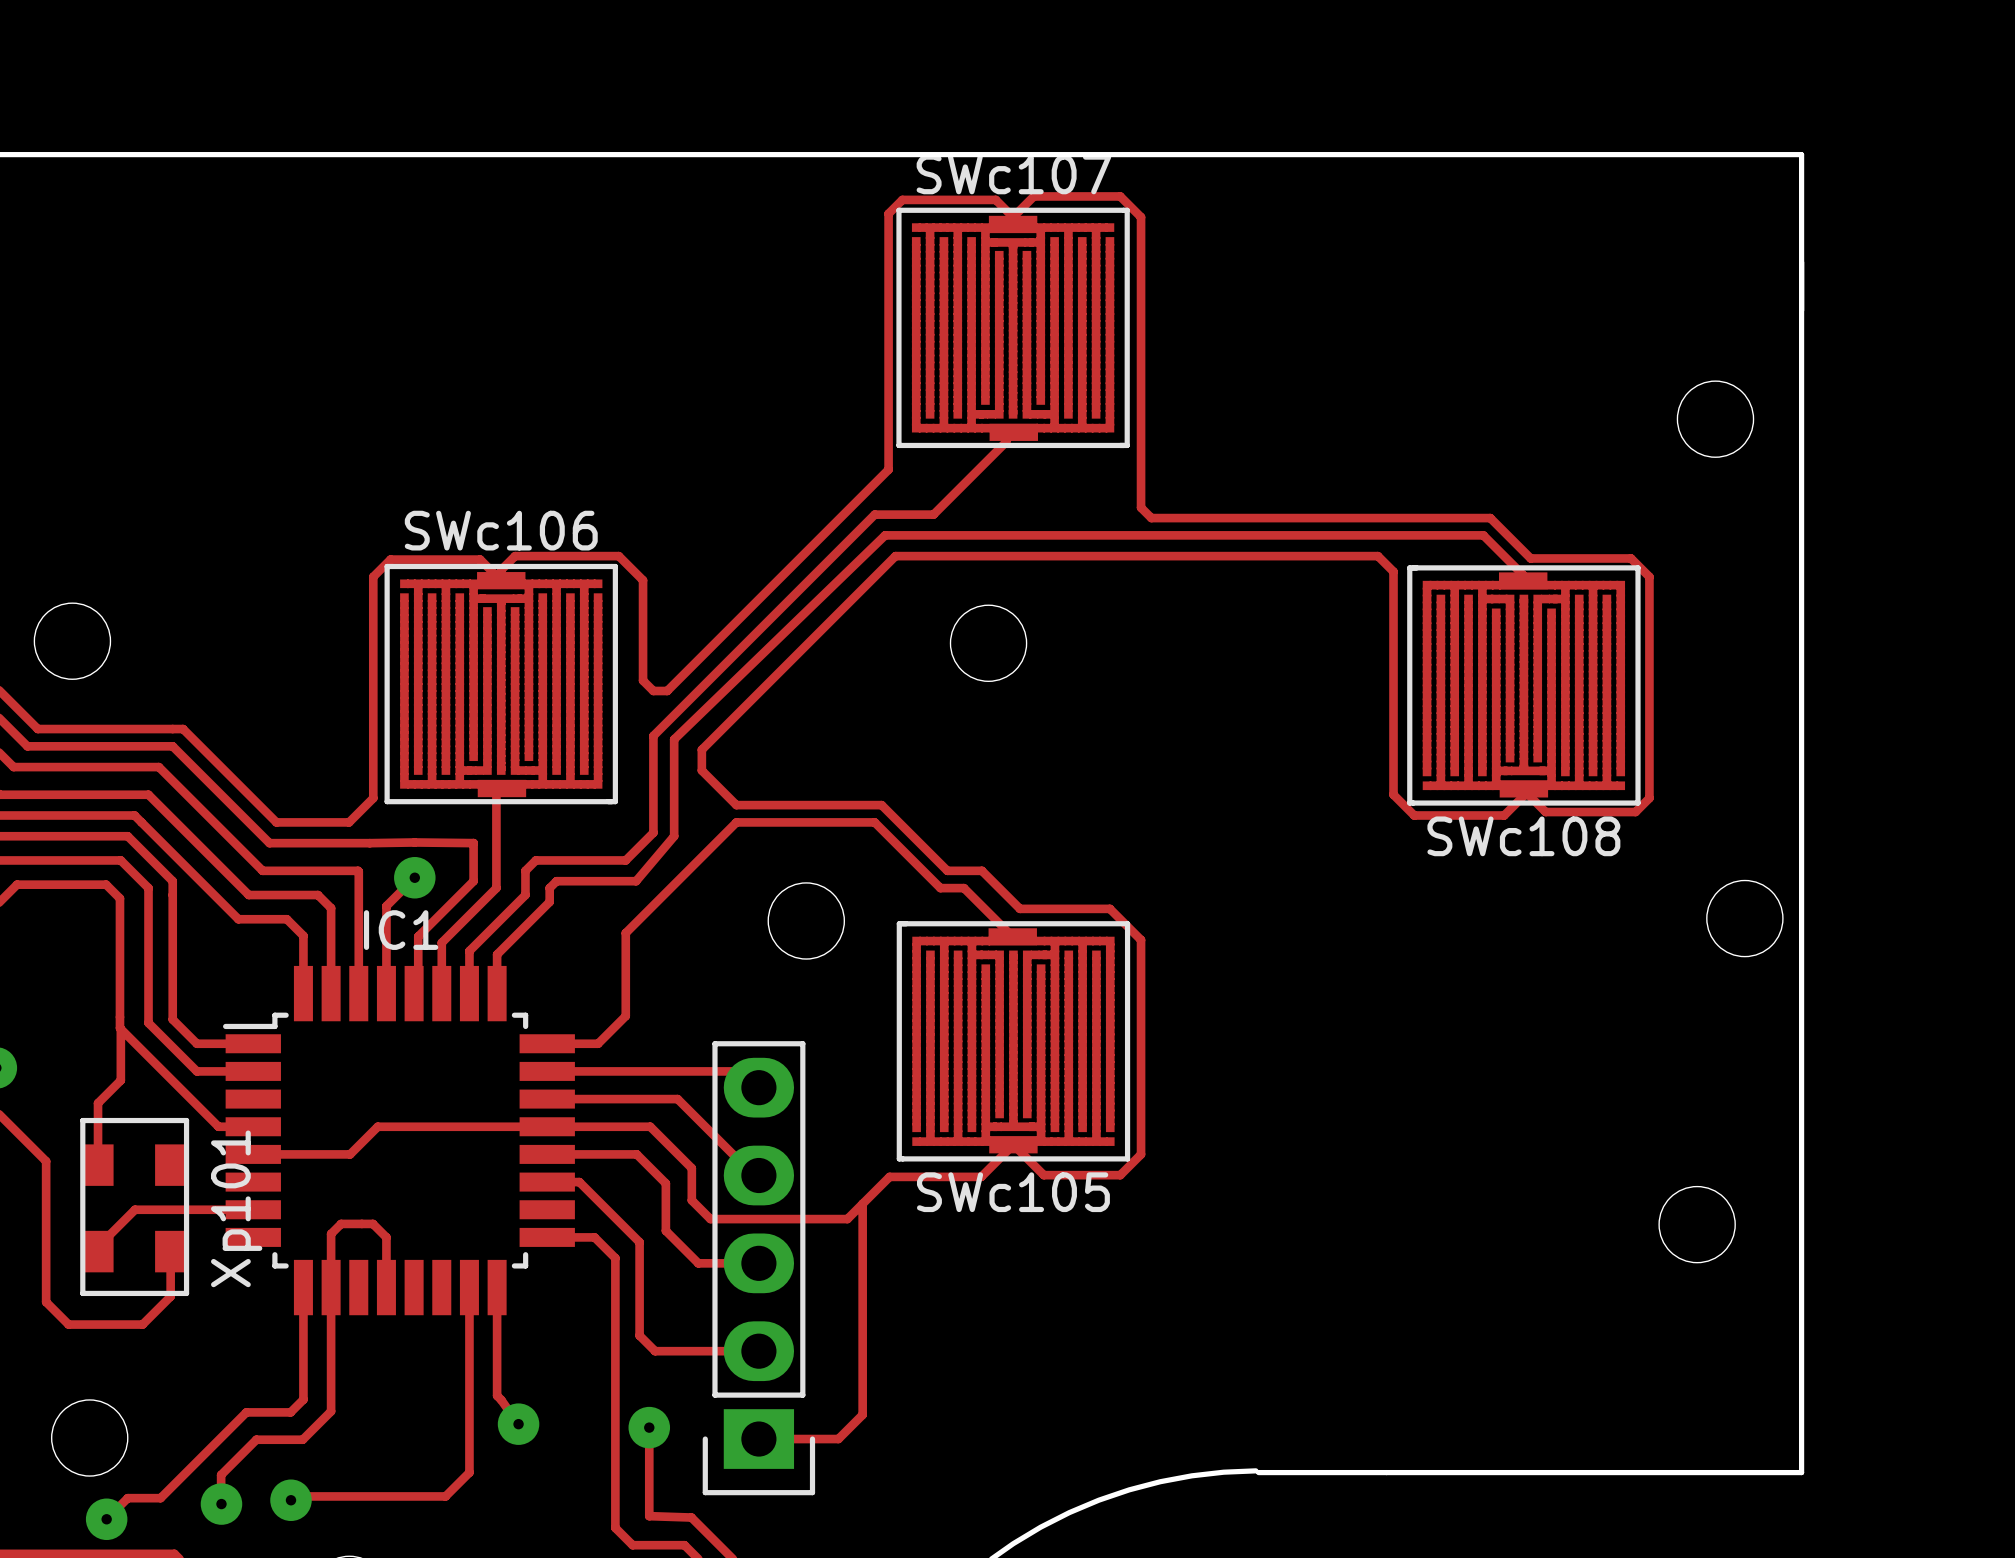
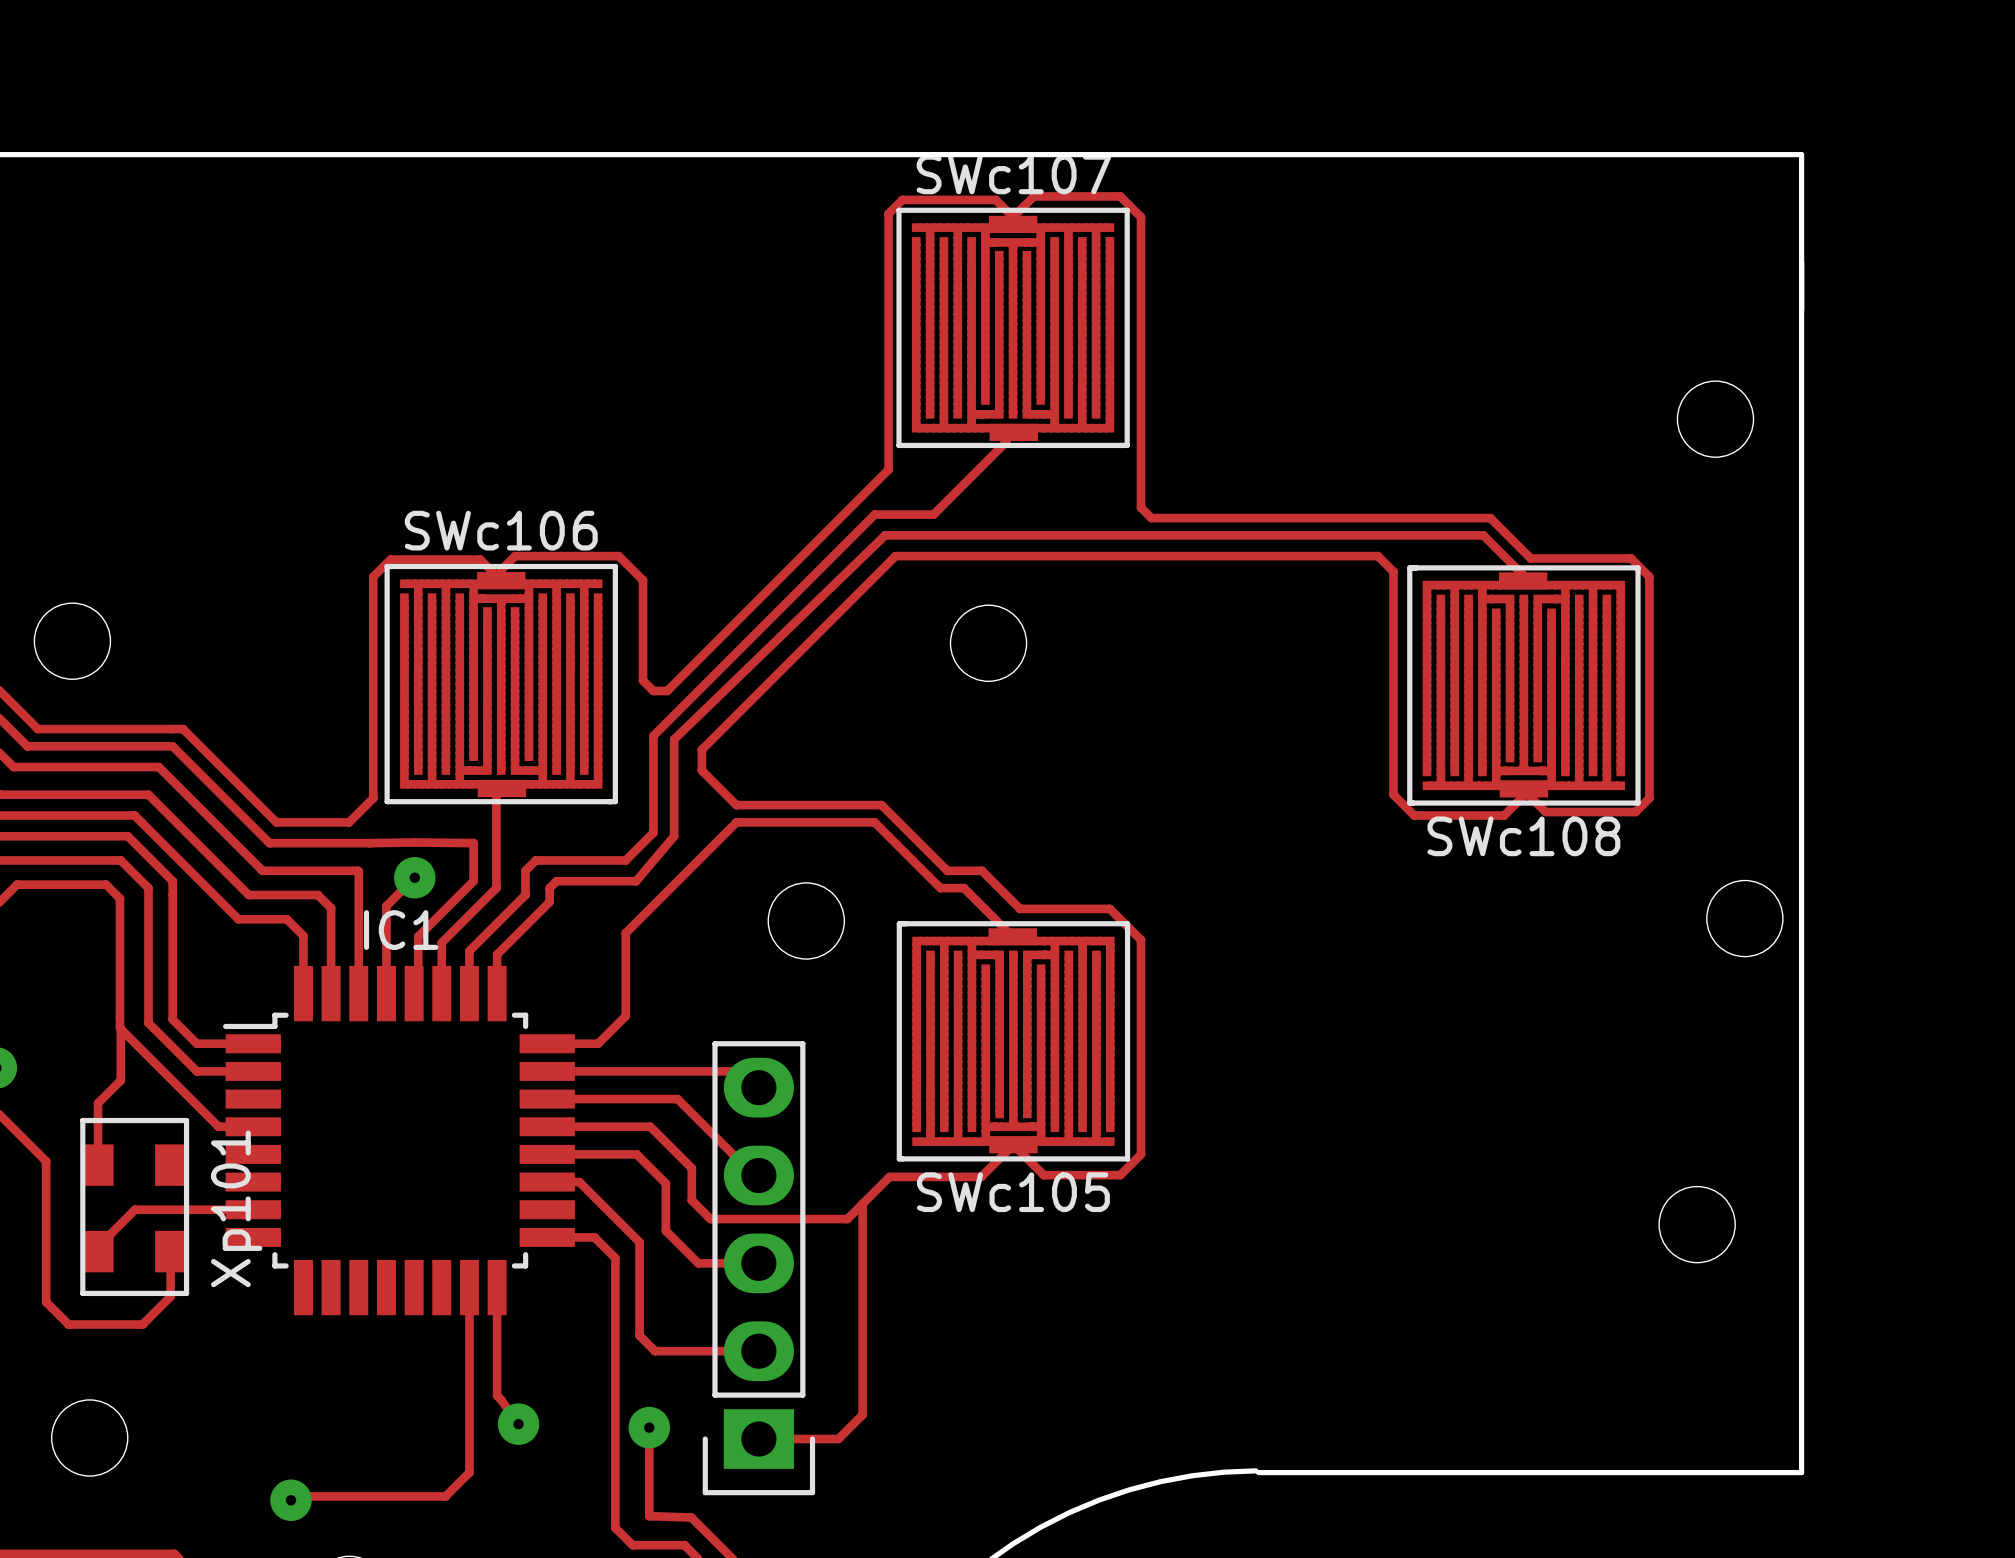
track: (547, 1126) (377, 1126) (350, 1154) (253, 1154) -> none
track: (303, 1287) (303, 1399) (290, 1412) (246, 1412) (160, 1498) (127, 1498) (106, 1519) -> none
track: (386, 1287) (386, 1237) (372, 1223) (341, 1223) (331, 1233) (331, 1411) (302, 1439) (256, 1439) (221, 1475) (221, 1503) -> none
via: (221, 1504) -> none
via: (106, 1519) -> none

